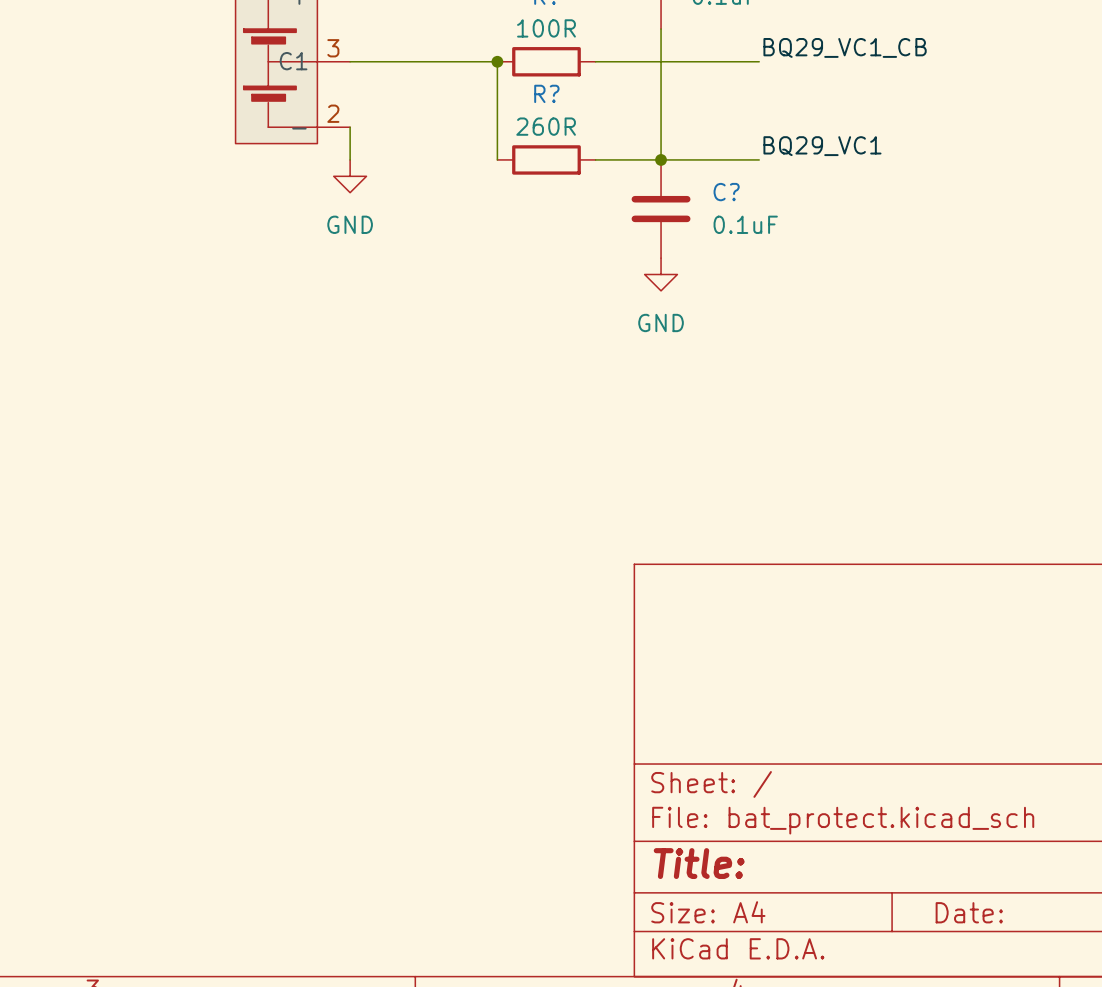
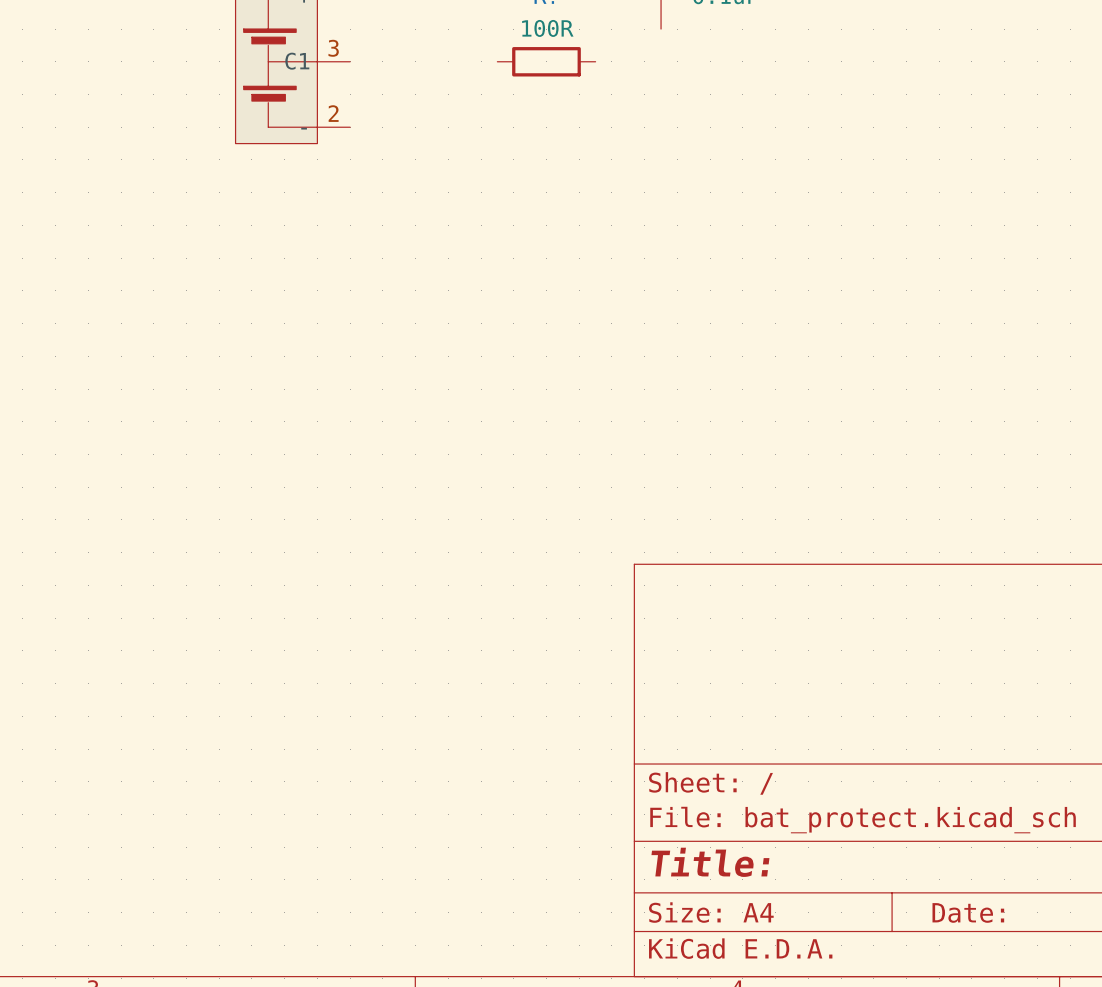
wire: (661, 29) (661, 159) -> none
label: BQ29_VC1_CB (845, 47) -> none
wire: (350, 61) (497, 61) (497, 159) -> none
junction: (497, 61) -> none
wire: (595, 61) (759, 61) -> none
wire: (350, 127) (350, 159) -> none
label: BQ29_VC1 (822, 146) -> none
R?: 260R (546, 159) -> none
wire: (595, 159) (759, 159) -> none
junction: (661, 159) -> none
power symbol: GND (350, 176) -> none
C?: 0.1uF (661, 209) -> none
power symbol: GND (661, 274) -> none

